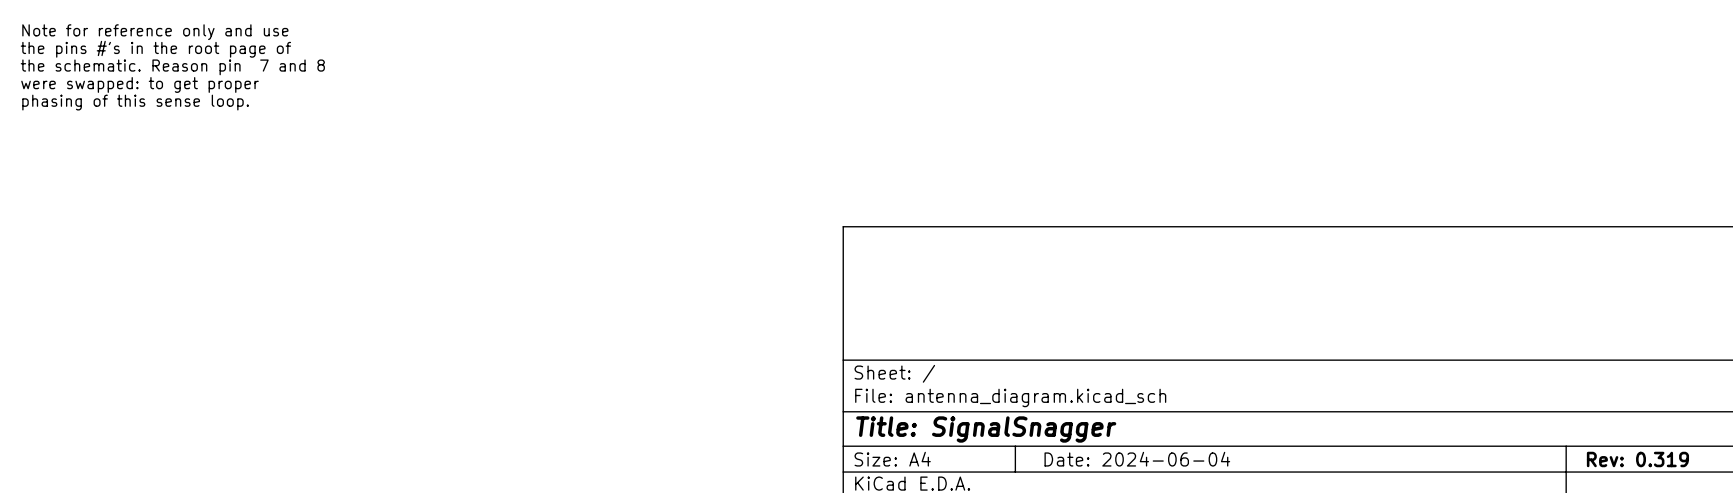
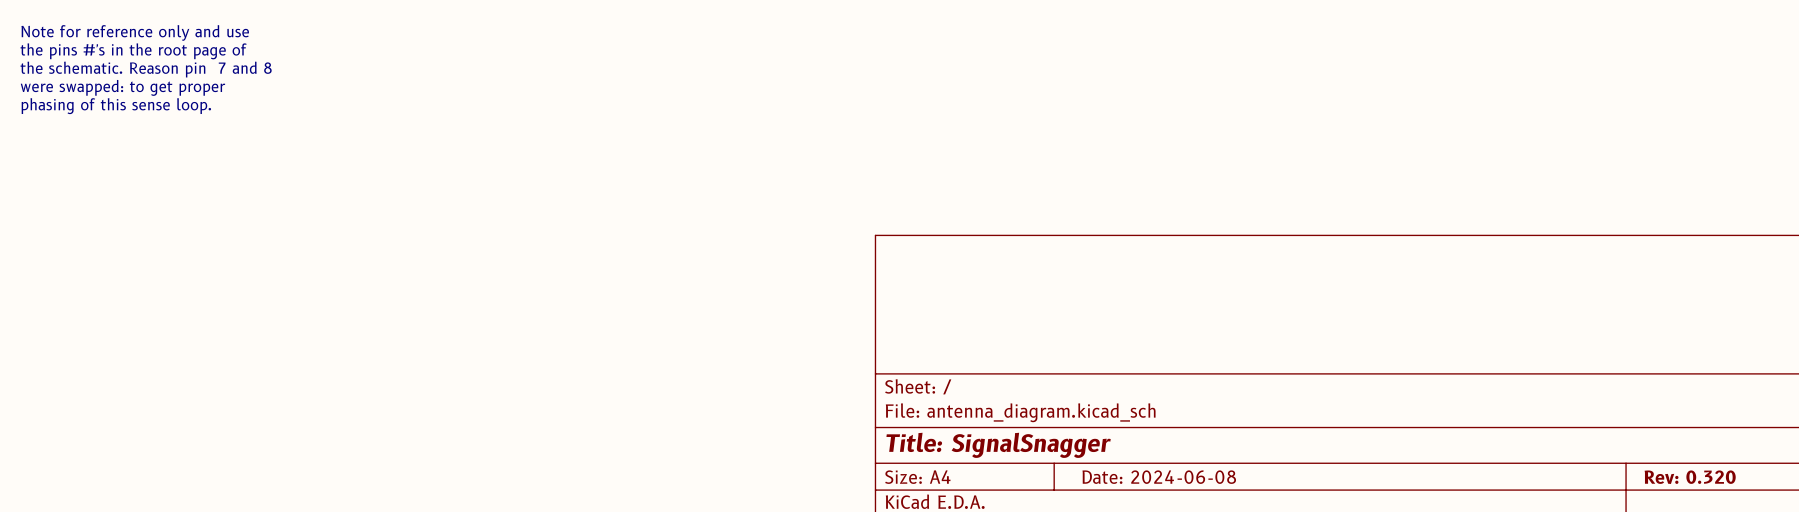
title block: Date: 2024-06-04 (1137, 459) -> Date: 2024-06-08 (1159, 477)
title block: Rev: 0.319 (1637, 459) -> Rev: 0.320 (1690, 477)

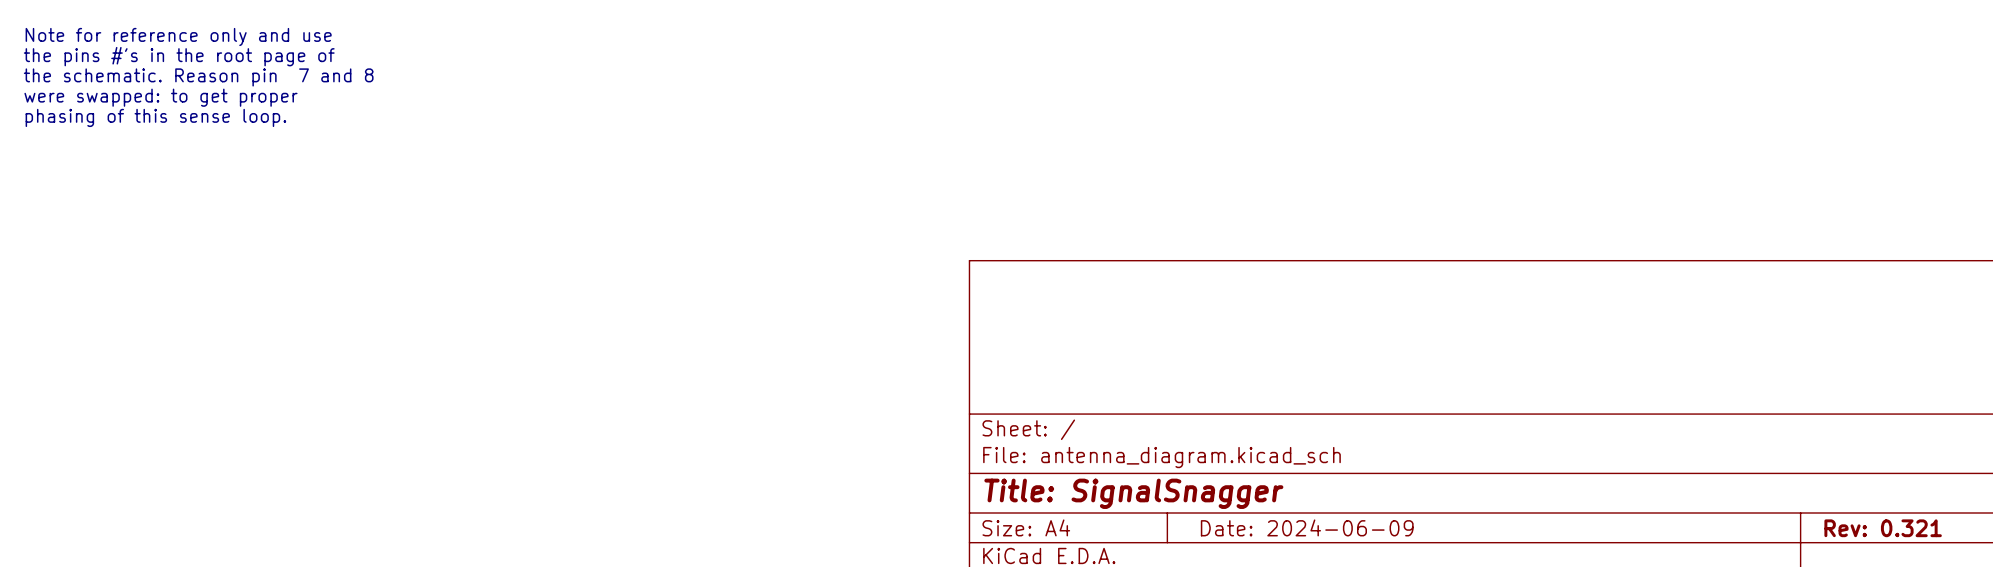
title block: Date: 2024-06-08 (1159, 477) -> Date: 2024-06-09 (1307, 527)
title block: Rev: 0.320 (1690, 477) -> Rev: 0.321 (1883, 528)

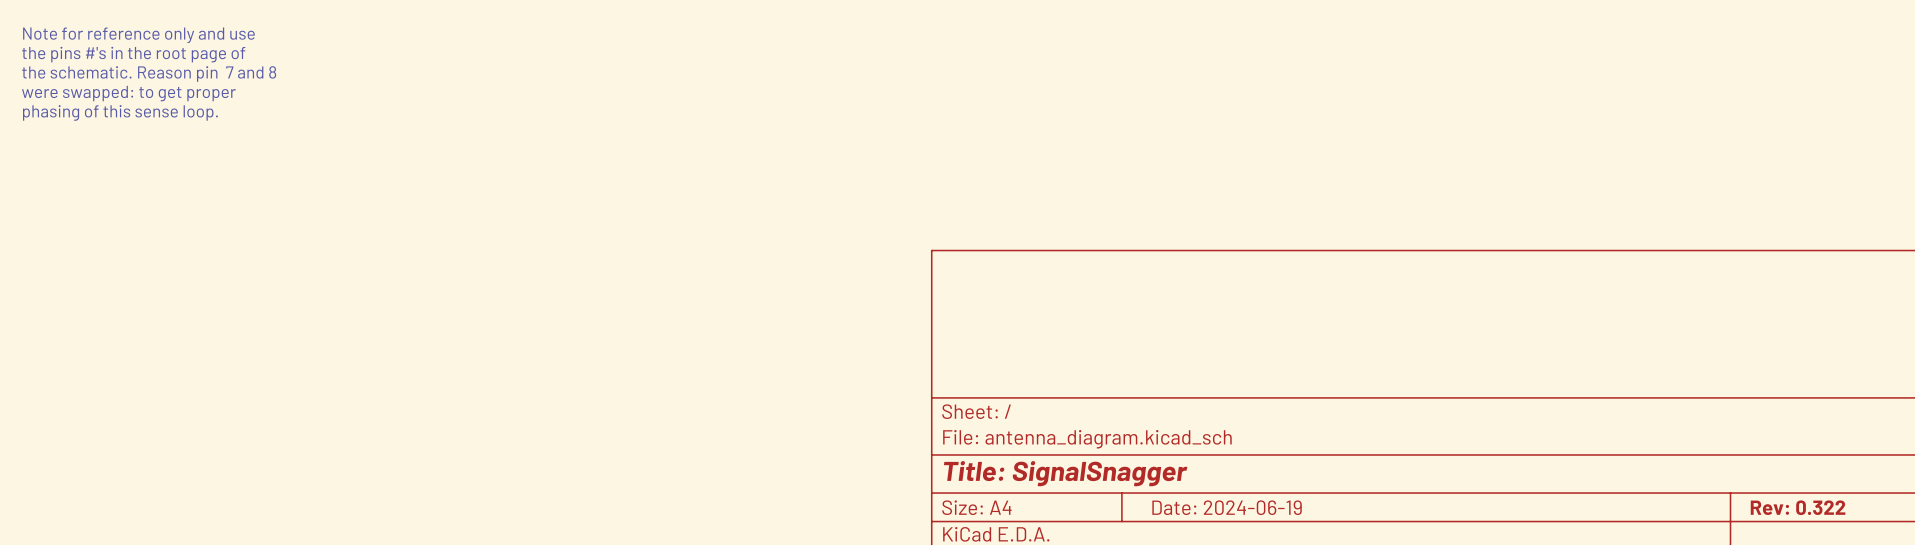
title block: Date: 2024-06-09 (1307, 527) -> Date: 2024-06-19 (1227, 507)
title block: Rev: 0.321 (1883, 528) -> Rev: 0.322 (1798, 507)

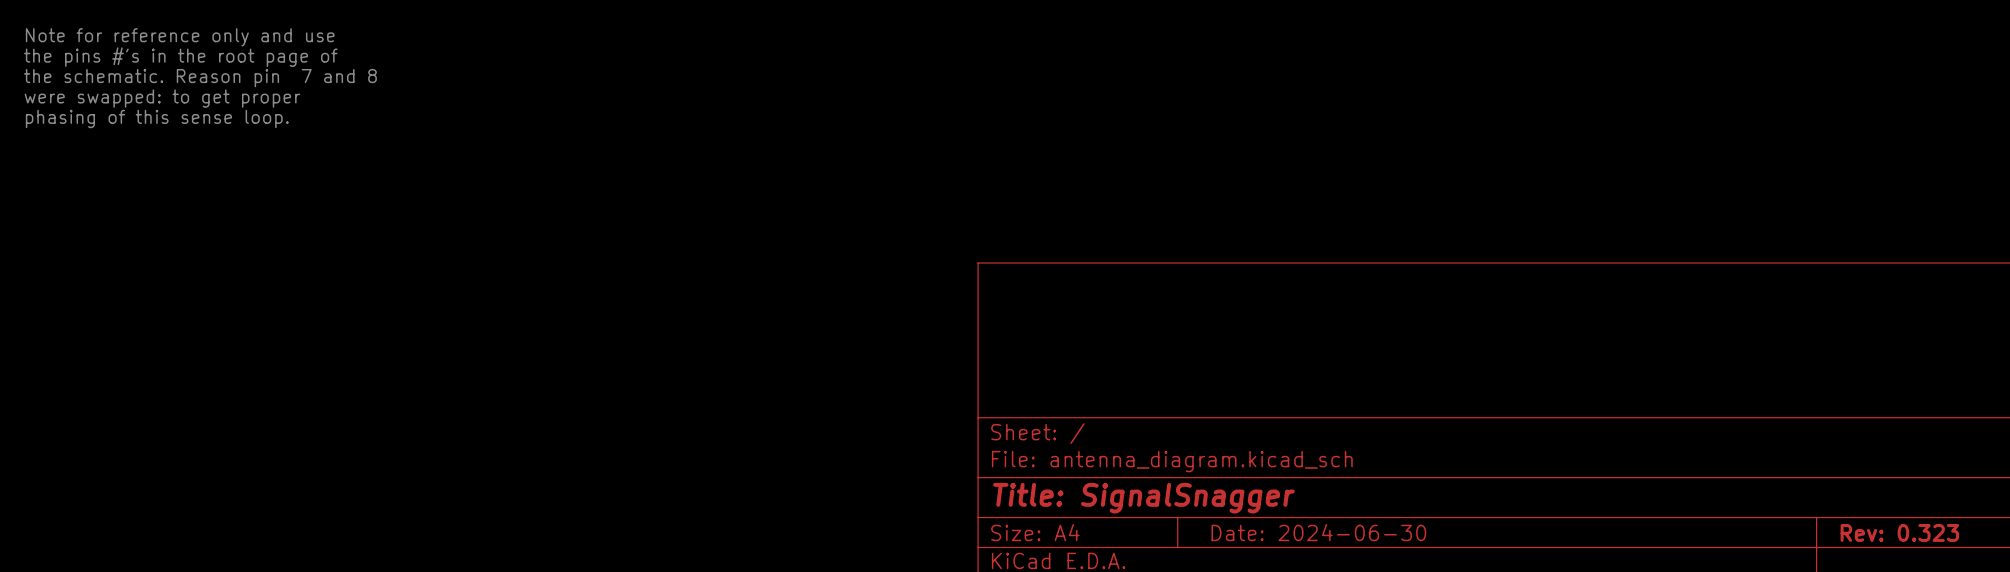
title block: Date: 2024-06-19 (1227, 507) -> Date: 2024-06-30 (1318, 532)
title block: Rev: 0.322 (1798, 507) -> Rev: 0.323 (1899, 532)

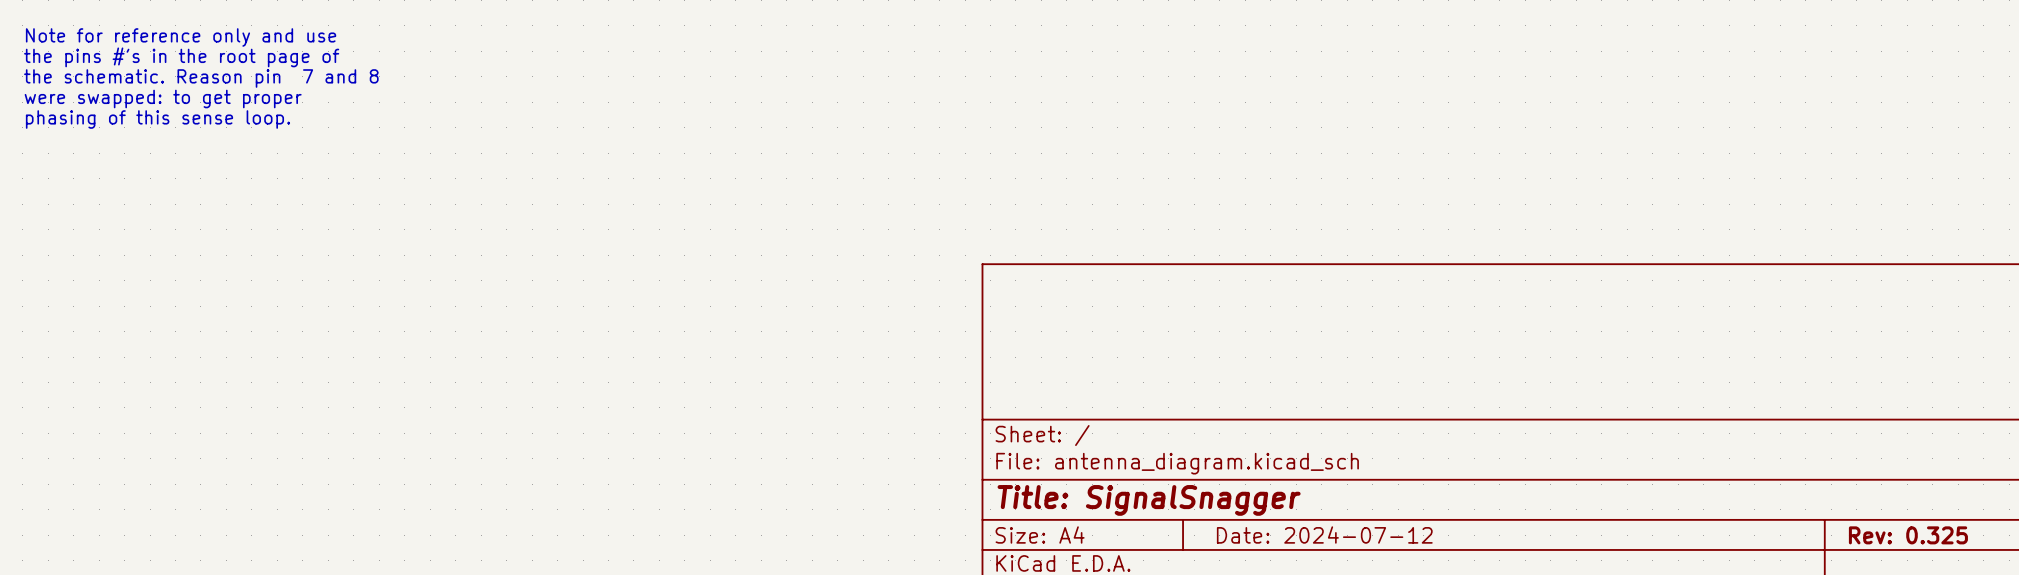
title block: Date: 2024-06-30 (1318, 532) -> Date: 2024-07-12 (1324, 535)
title block: Rev: 0.323 (1899, 532) -> Rev: 0.325 (1908, 535)

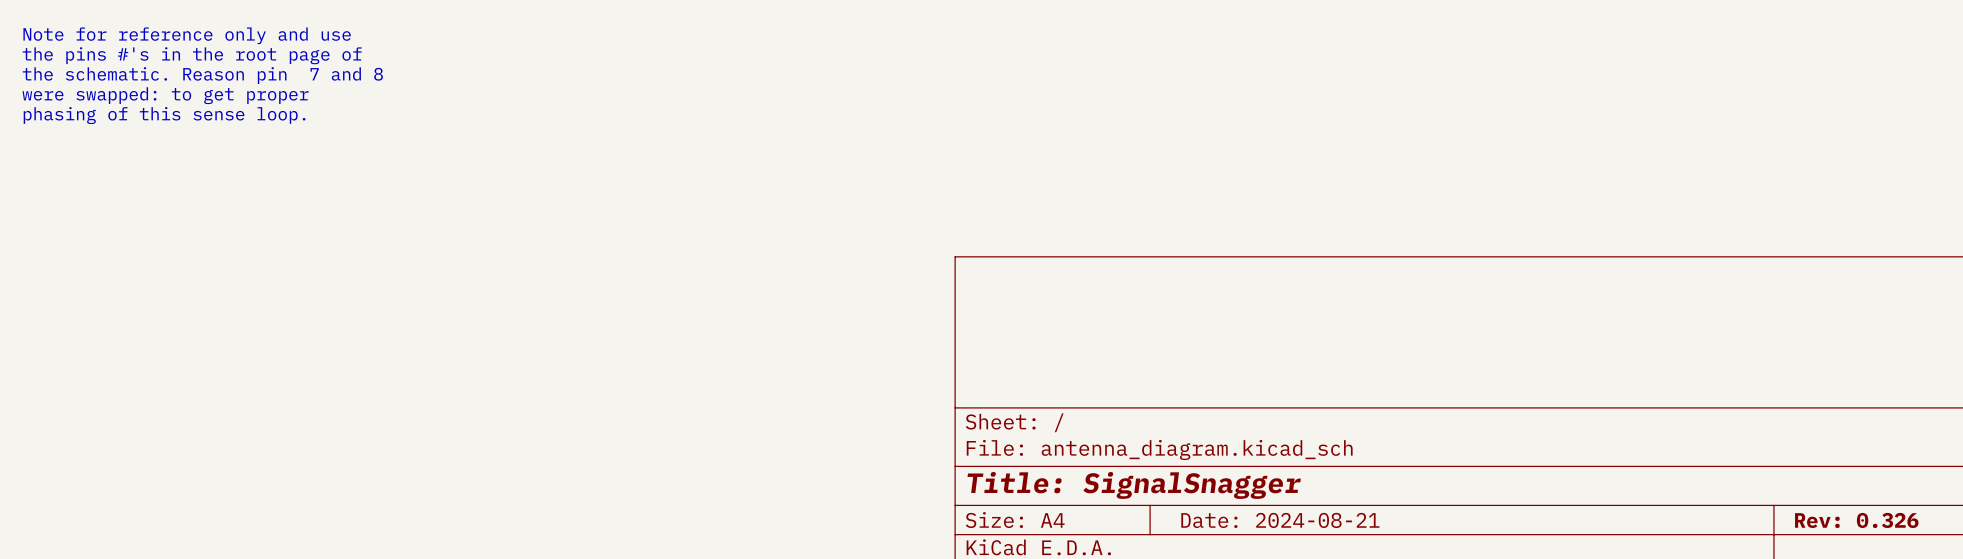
title block: Date: 2024-07-12 (1324, 535) -> Date: 2024-08-21 (1280, 520)
title block: Rev: 0.325 (1908, 535) -> Rev: 0.326 (1856, 520)

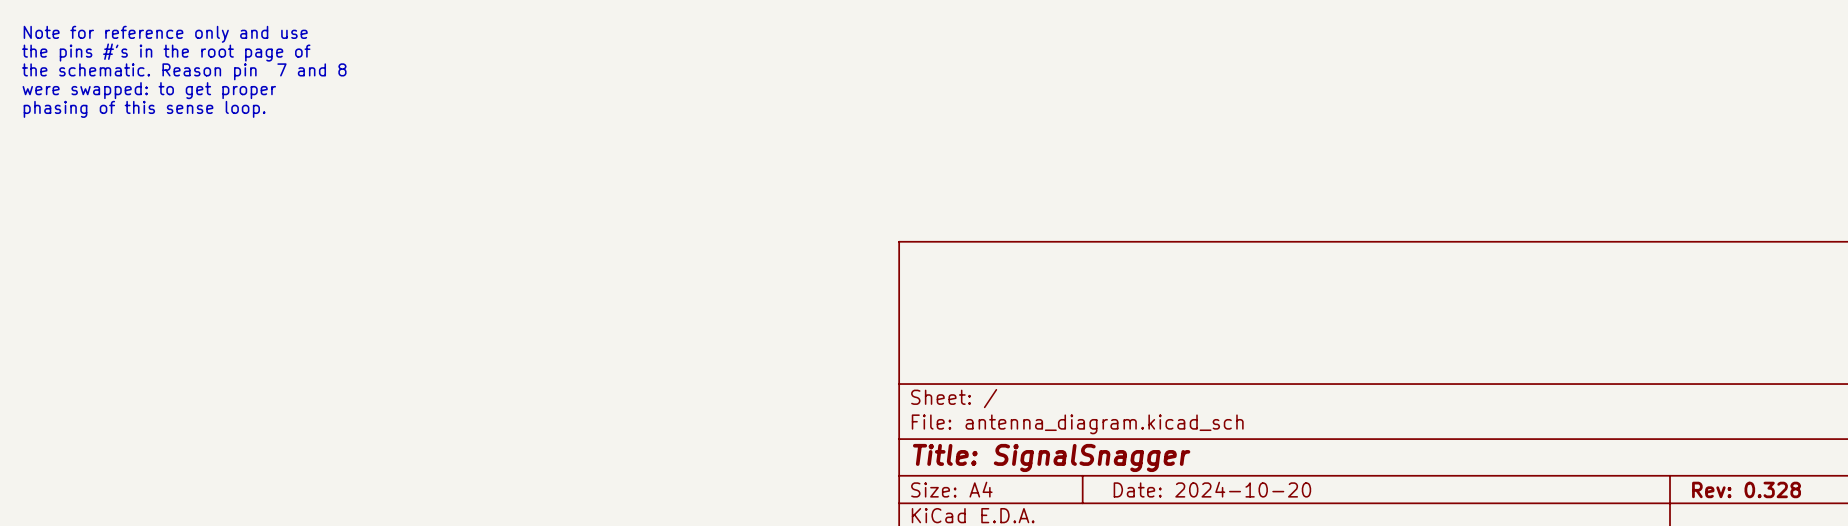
title block: Date: 2024-08-21 (1280, 520) -> Date: 2024-10-20 (1212, 489)
title block: Rev: 0.326 (1856, 520) -> Rev: 0.328 (1746, 489)

